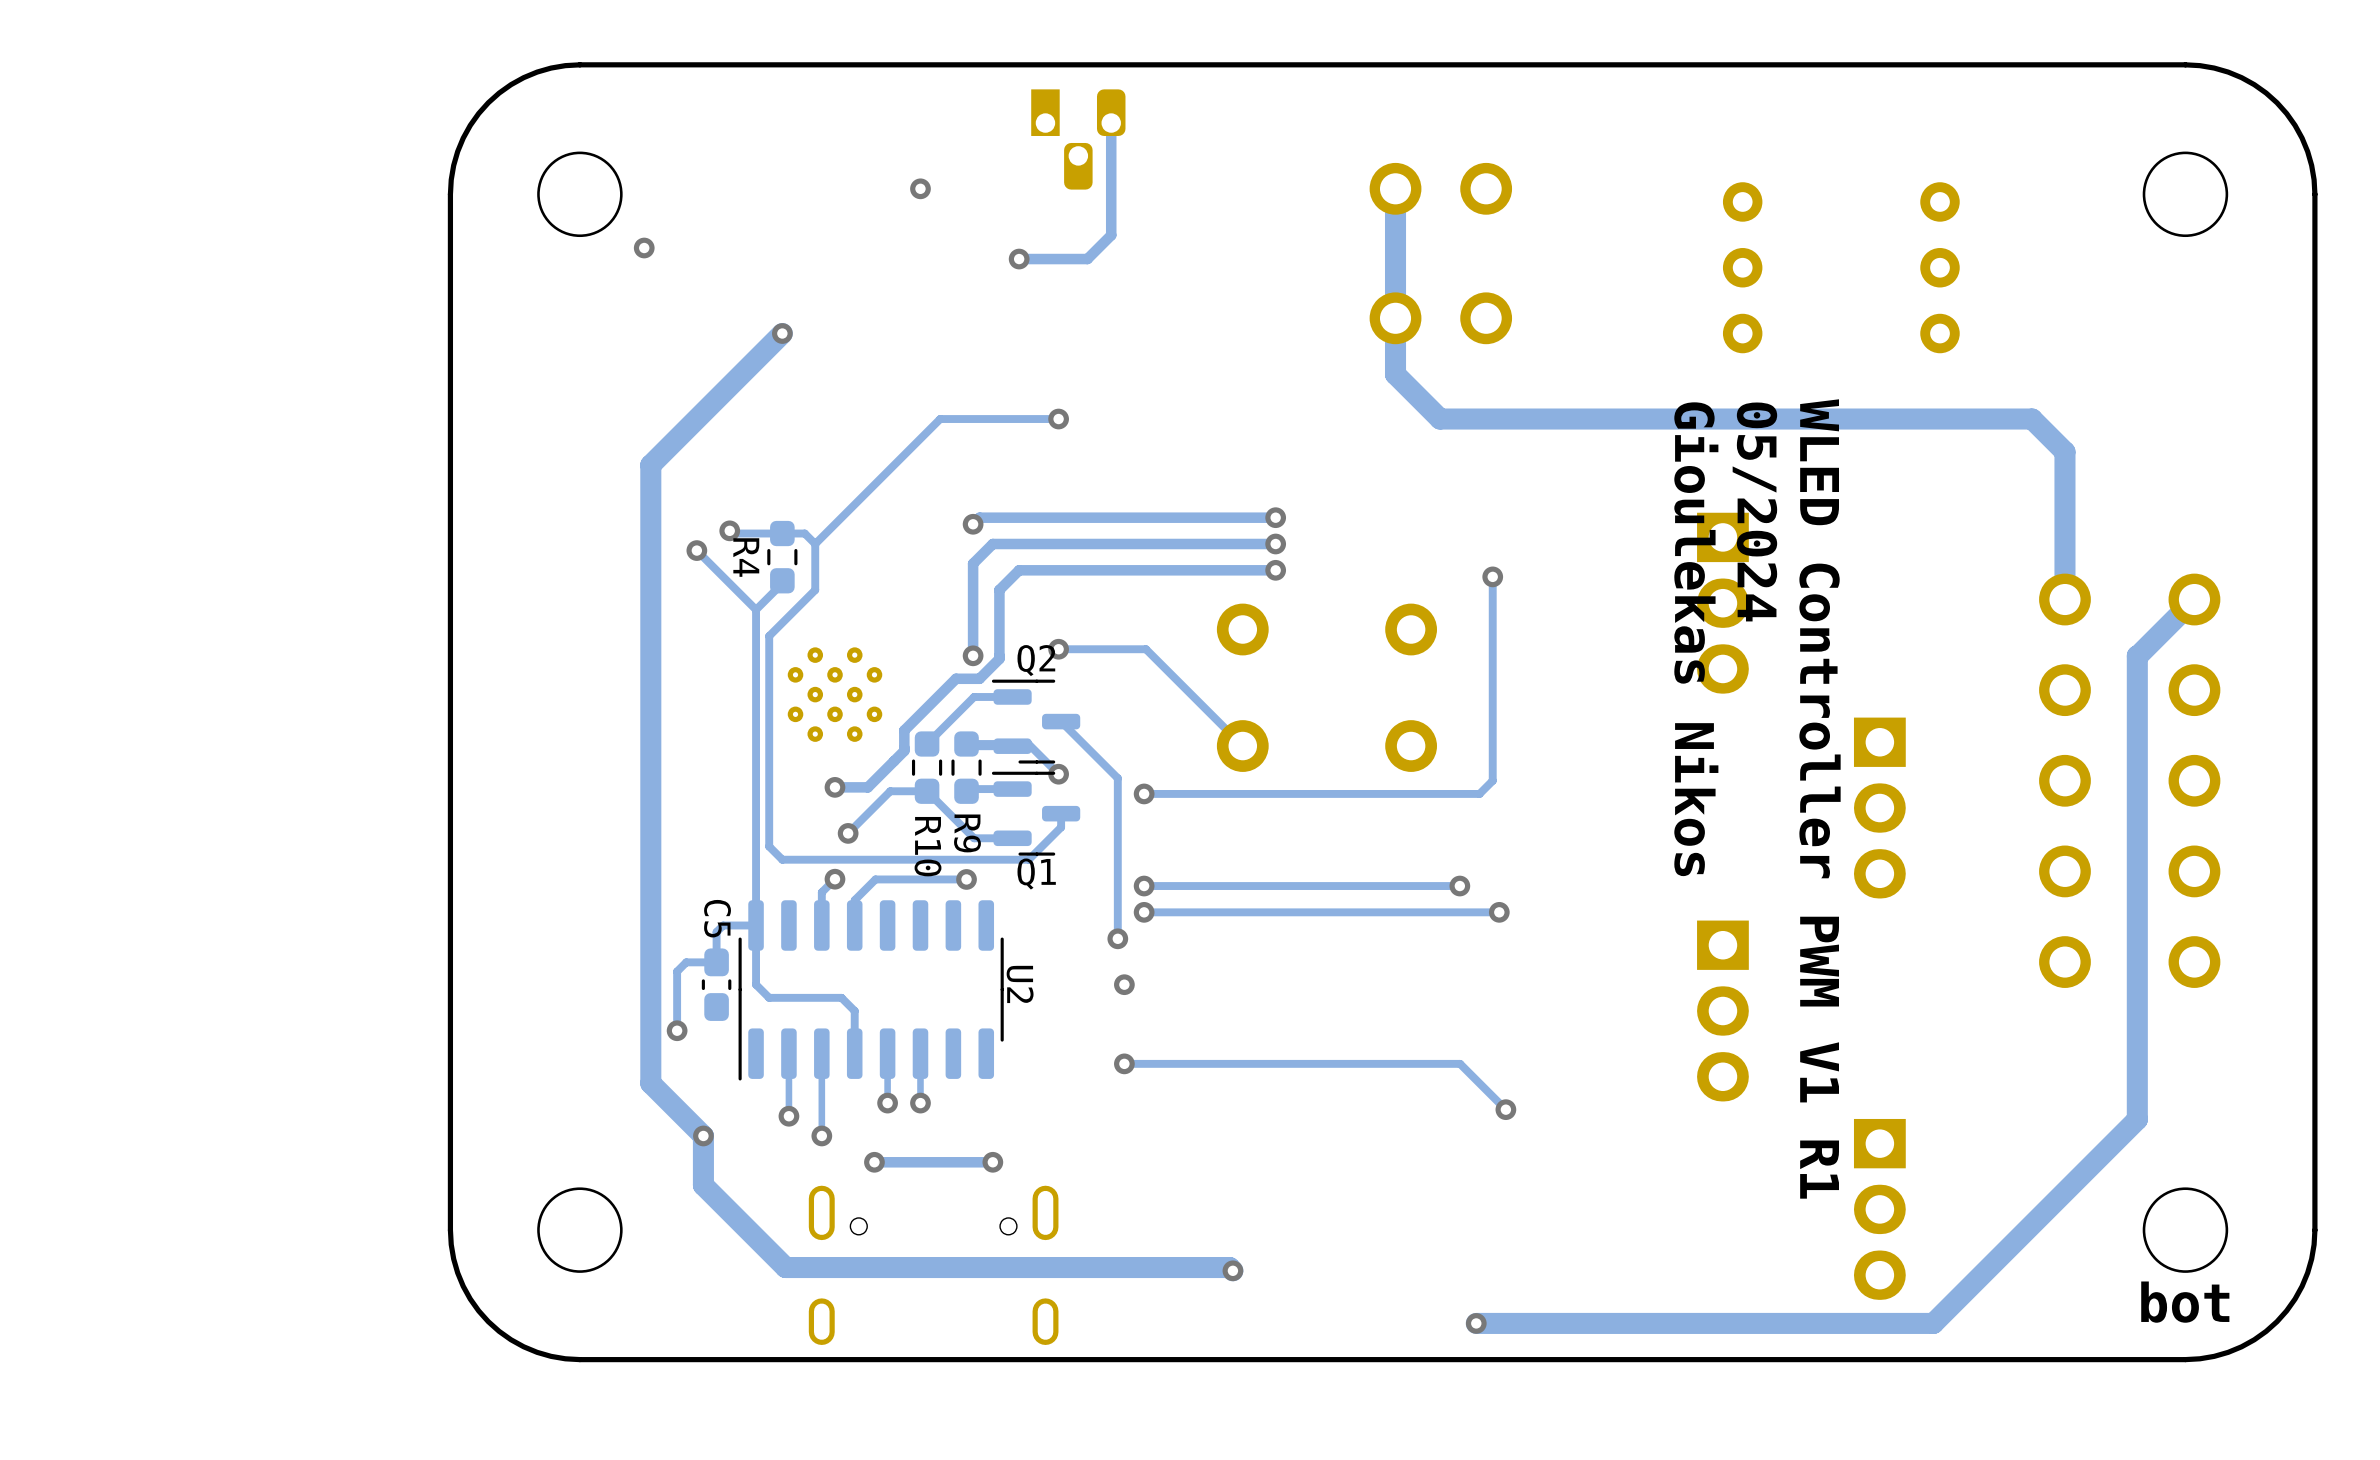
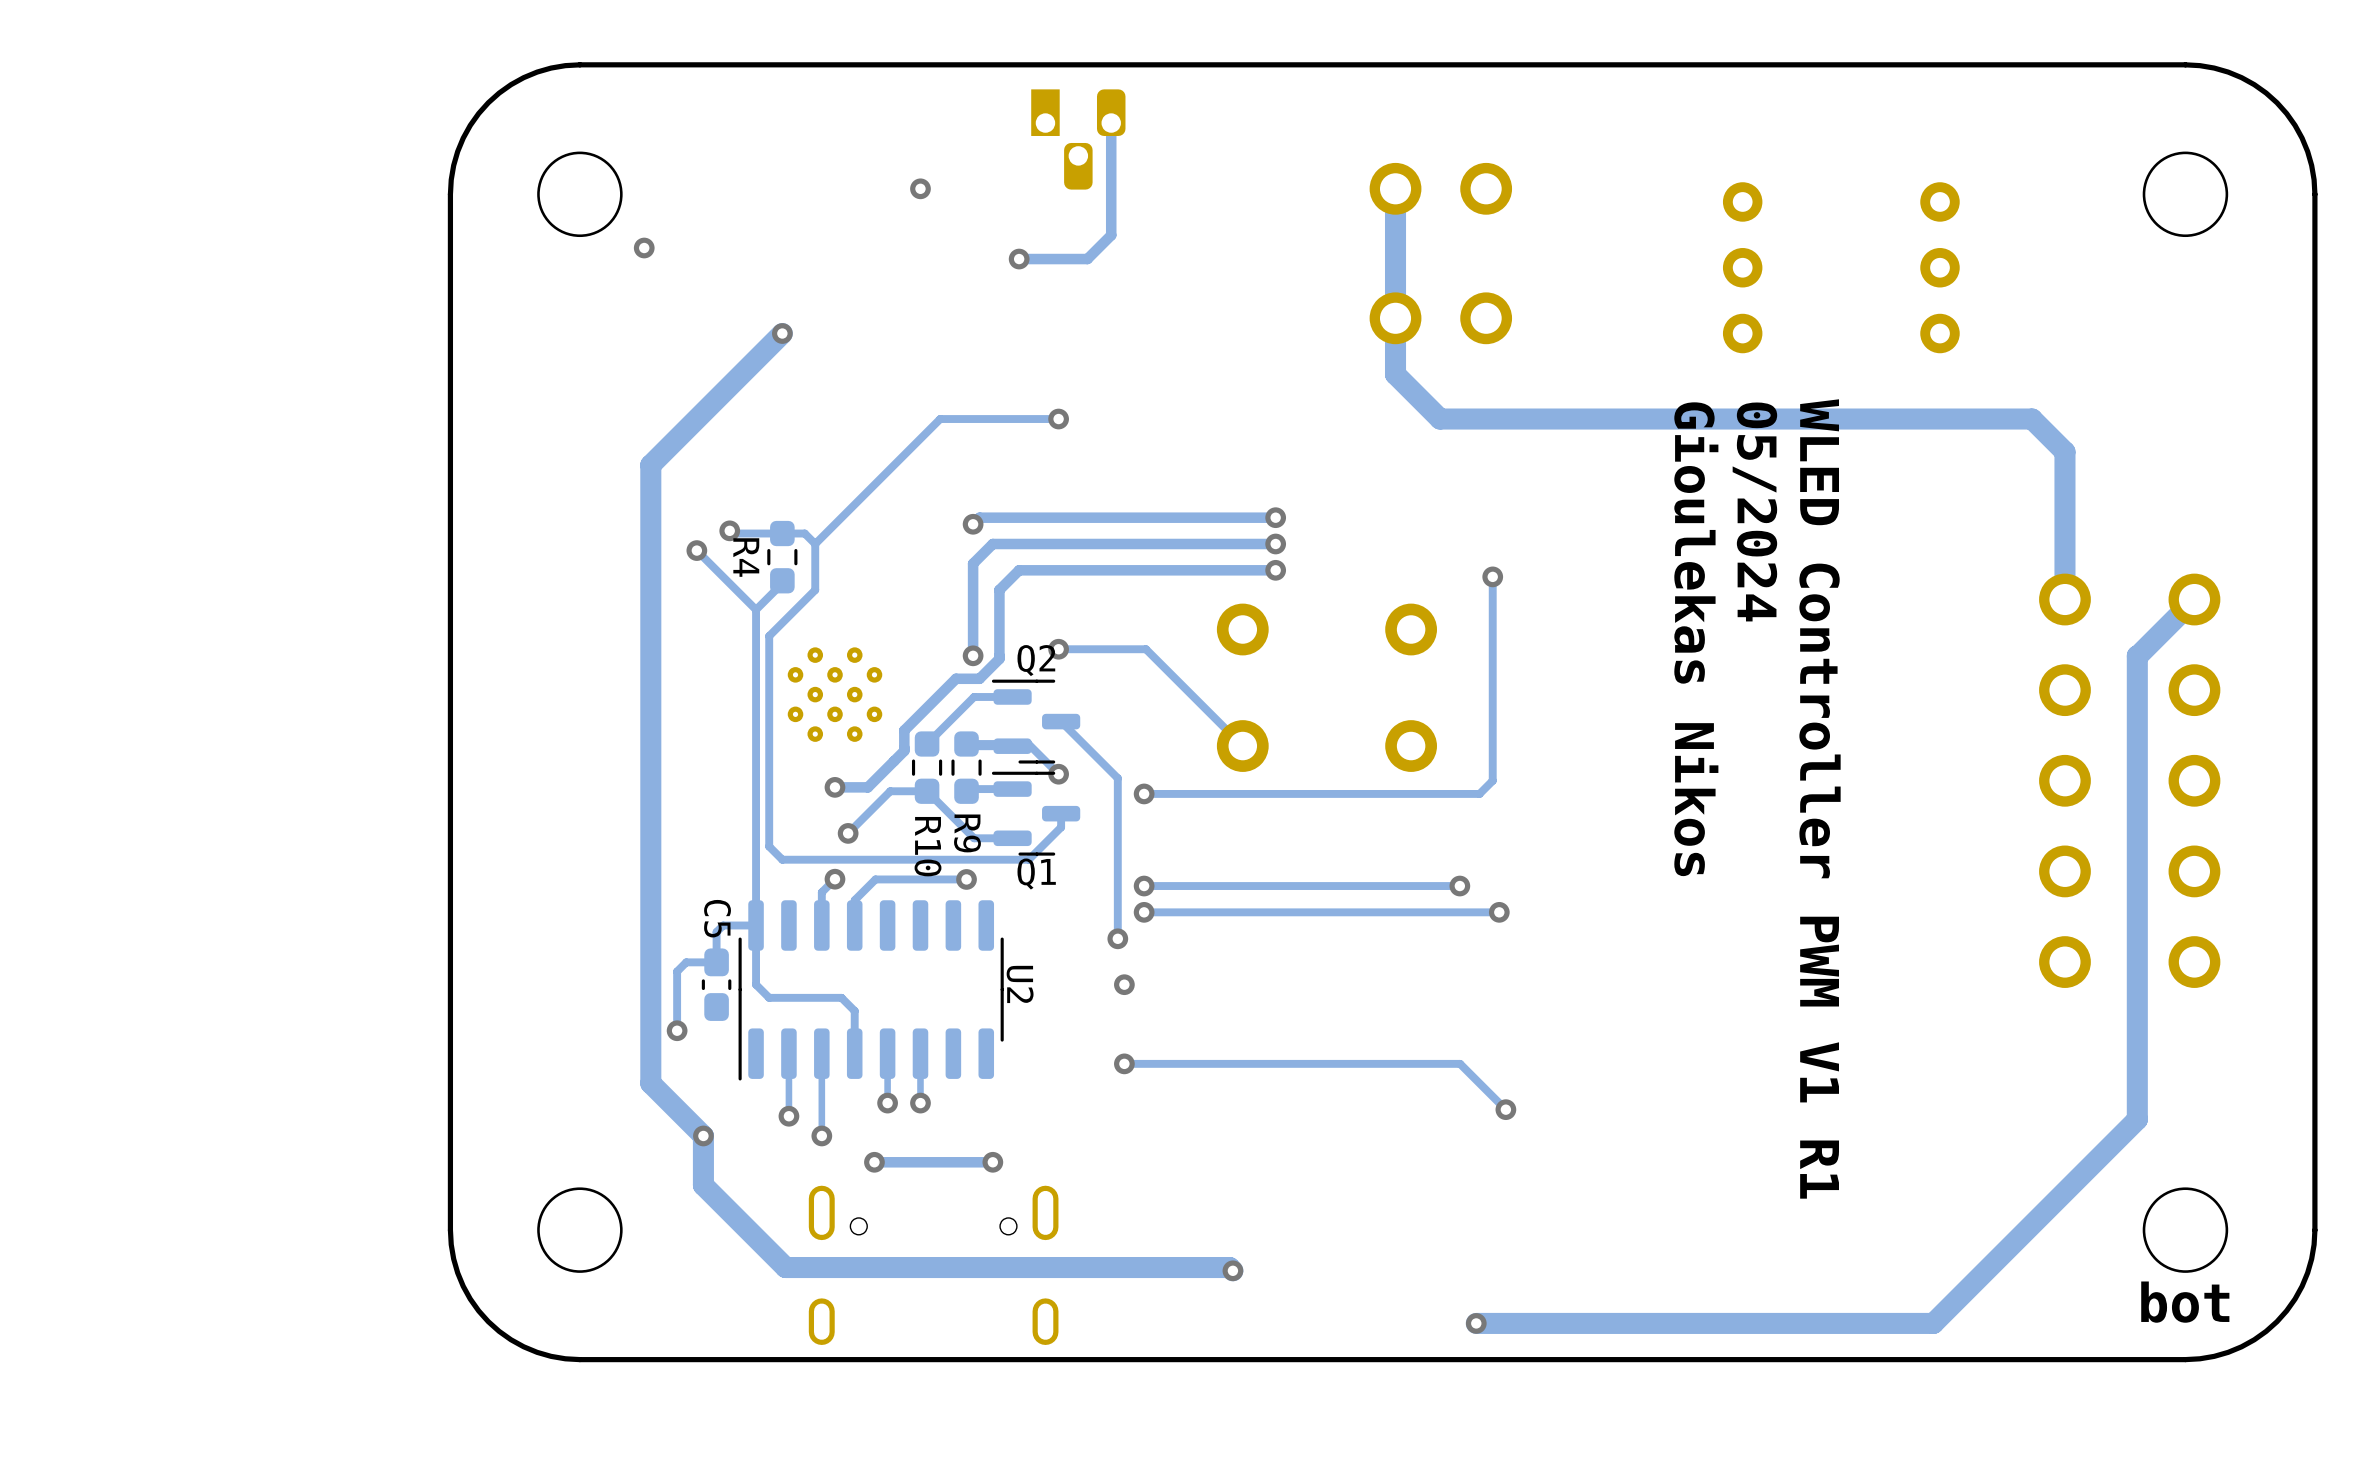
part: (1722, 603) -> none
part: (1879, 808) -> none
part: (1722, 1011) -> none
part: (1879, 1209) -> none

